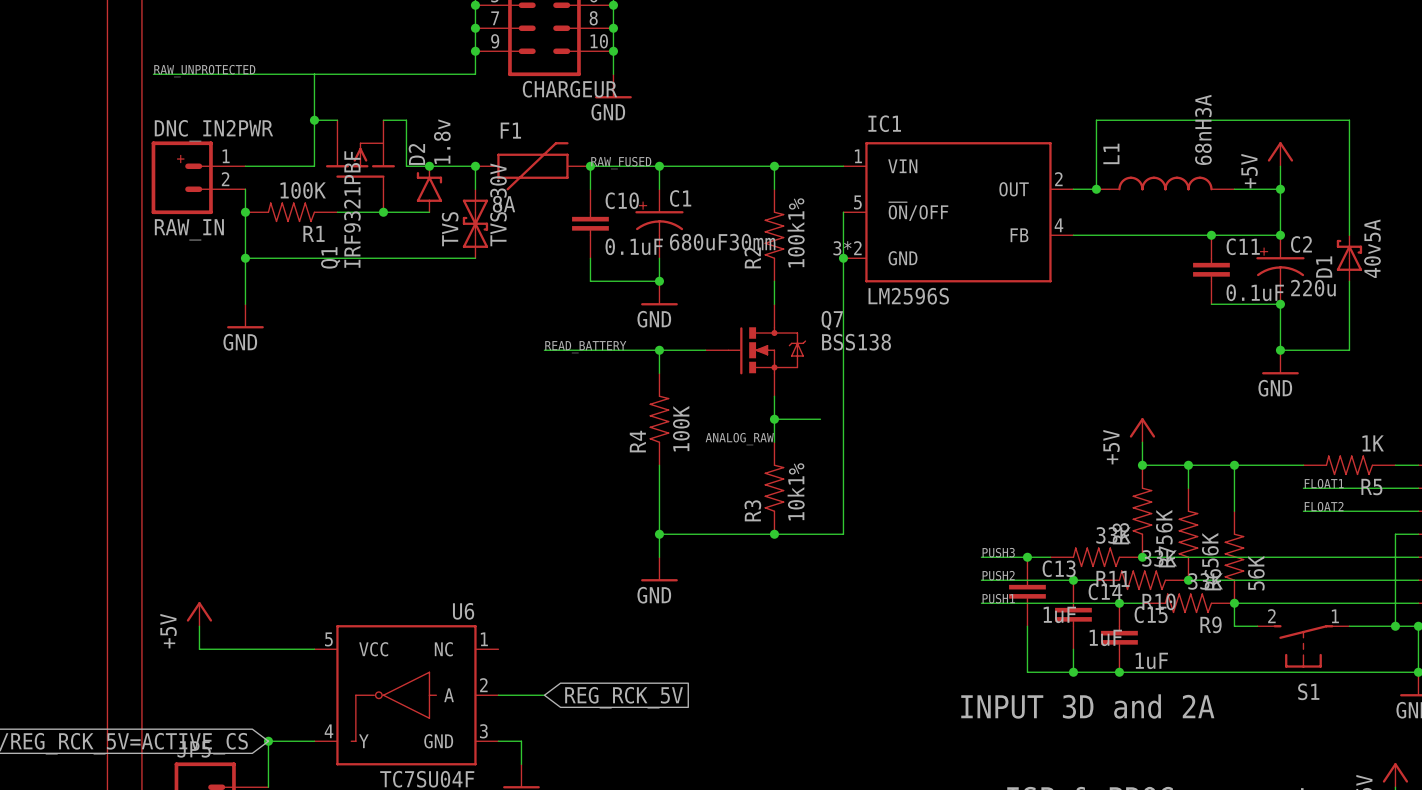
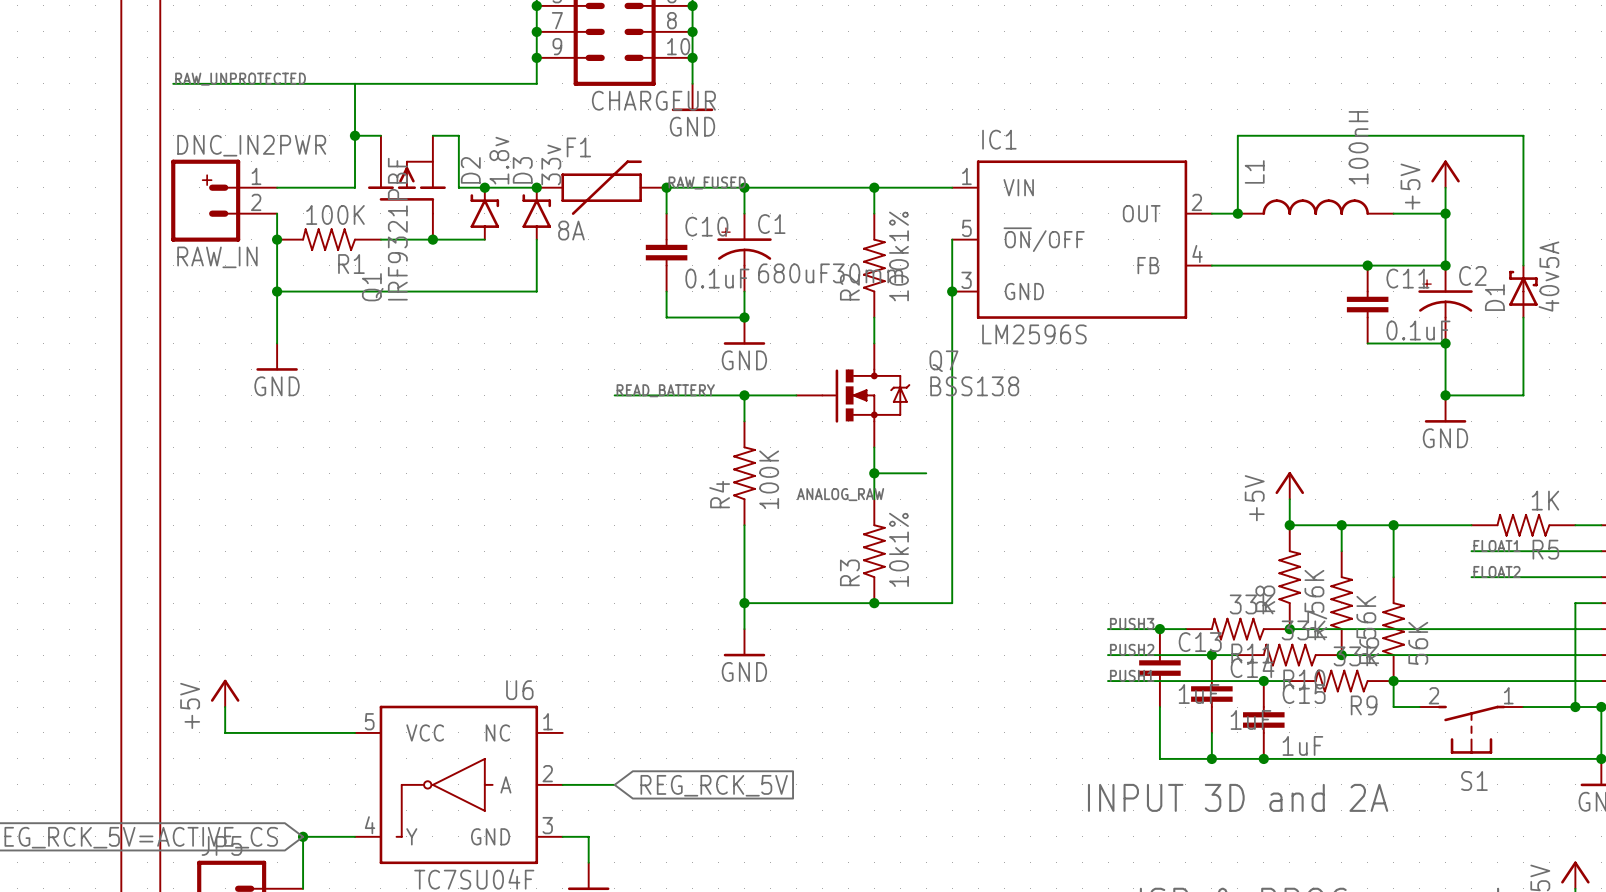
L1 value: 68nH3A (1203, 129) -> 100nH (1358, 147)
D3: none -> 33v (536, 213)
TVS: TVS-30V (475, 223) -> none
IC1 pin number: 3*2 (847, 248) -> 3 (966, 280)
C2 value: 220u (1313, 288) -> none

